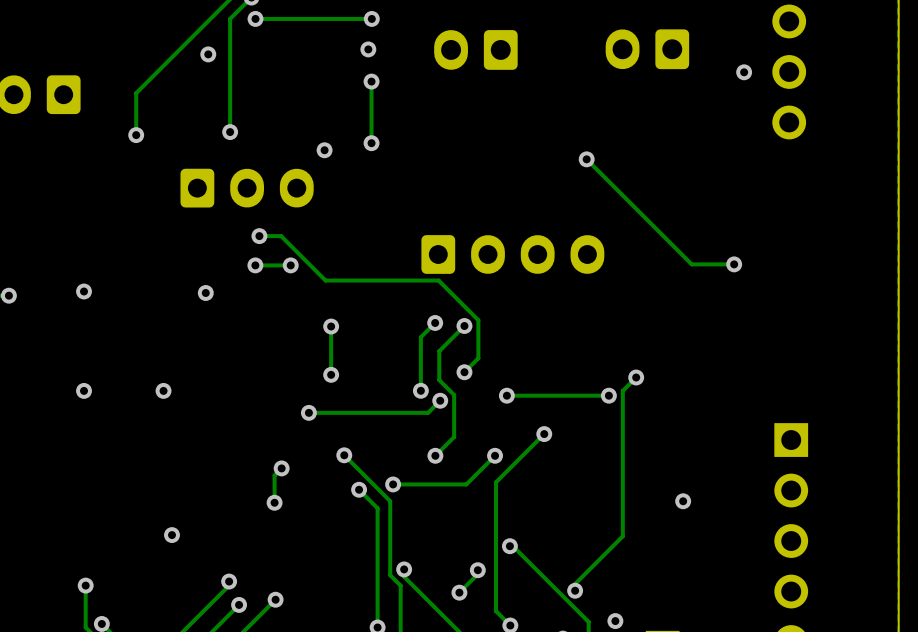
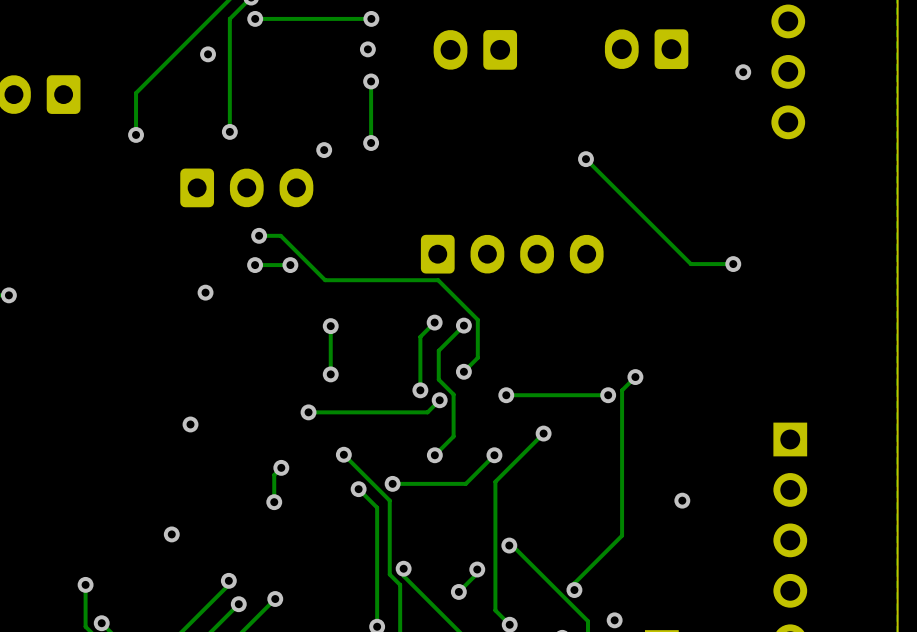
via: (84, 291) -> none
via: (84, 390) -> none
via position: (163, 390) -> (190, 424)

